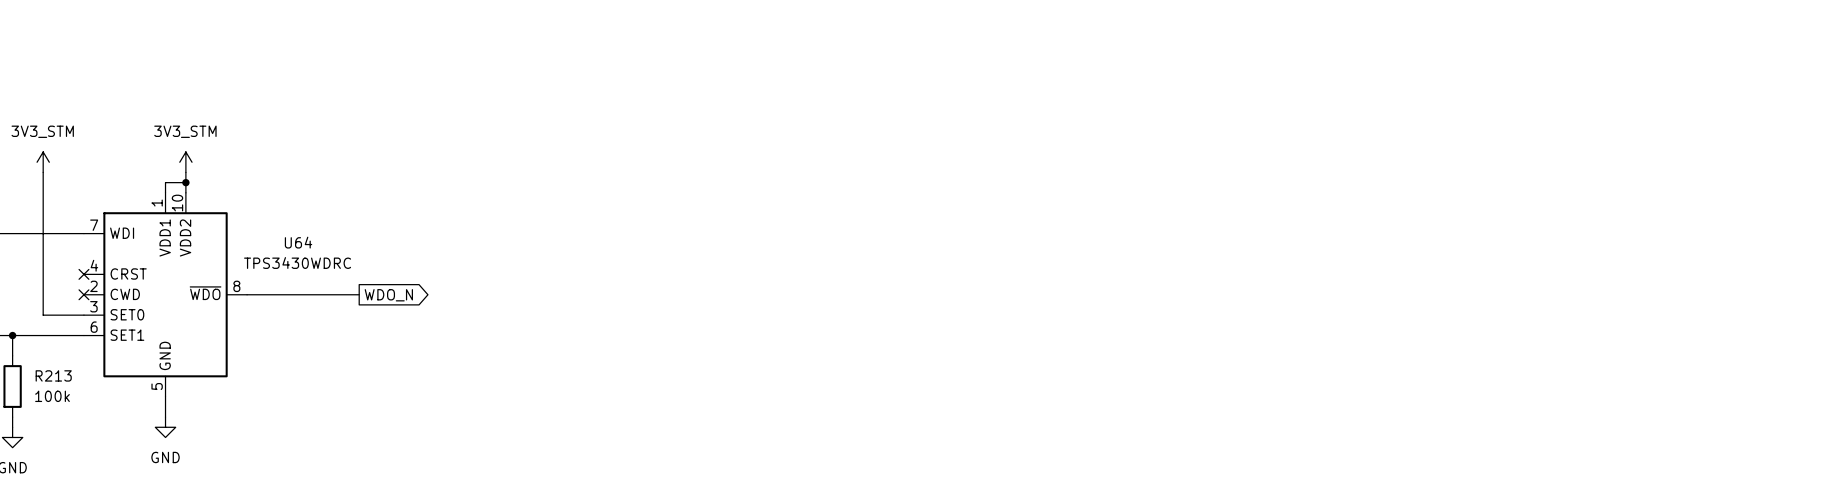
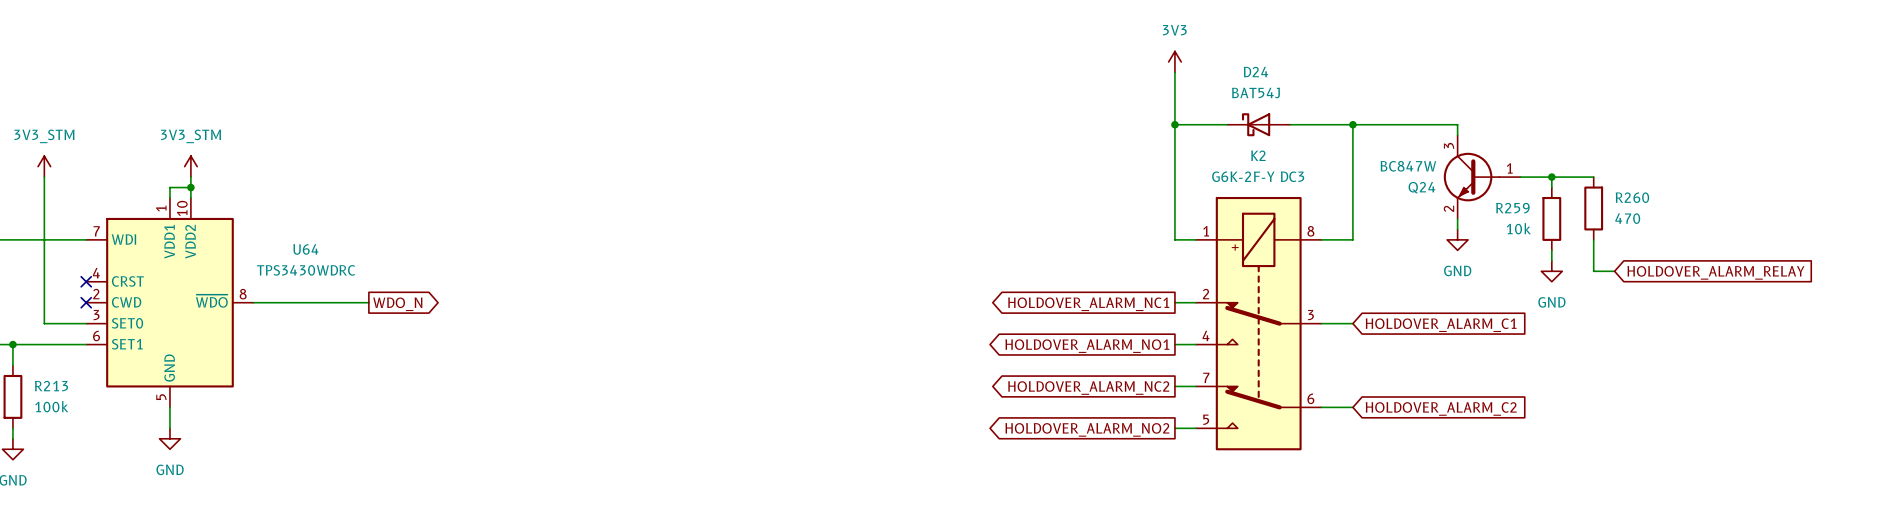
power symbol: none -> 3V3 (1174, 61)
wire: none -> (1174, 72) (1174, 239) (1195, 239)
wire: none -> (1174, 124) (1227, 124)
junction: none -> (1174, 124)
D24: none -> BAT54J (1258, 124)
wire: none -> (1290, 124) (1457, 124) (1457, 135)
wire: none -> (1352, 124) (1352, 239) (1321, 239)
junction: none -> (1352, 124)
Q24: none -> BC847W (1482, 177)
wire: none -> (1520, 177) (1593, 177)
wire: none -> (1551, 177) (1551, 187)
junction: none -> (1551, 177)
R260: none -> 470 (1593, 208)
wire: none -> (1457, 218) (1457, 229)
R259: none -> 10k (1551, 218)
power symbol: none -> GND (1457, 239)
wire: none -> (1593, 239) (1593, 271) (1614, 271)
wire: none -> (1551, 250) (1551, 260)
power symbol: none -> GND (1551, 271)
global label: none -> HOLDOVER_ALARM_RELAY (1715, 272)
wire: none -> (1174, 302) (1195, 302)
global label: none -> HOLDOVER_ALARM_NC1 (1088, 304)
K2: none -> G6K-2F-Y DC3 (1258, 323)
wire: none -> (1321, 323) (1352, 323)
global label: none -> HOLDOVER_ALARM_C1 (1441, 325)
wire: none -> (1174, 344) (1195, 344)
global label: none -> HOLDOVER_ALARM_NO1 (1087, 346)
global label: none -> HOLDOVER_ALARM_NC2 (1088, 388)
wire: none -> (1174, 386) (1195, 386)
wire: none -> (1321, 407) (1352, 407)
global label: none -> HOLDOVER_ALARM_C2 (1441, 408)
global label: none -> HOLDOVER_ALARM_NO2 (1087, 429)
wire: none -> (1174, 428) (1195, 428)

